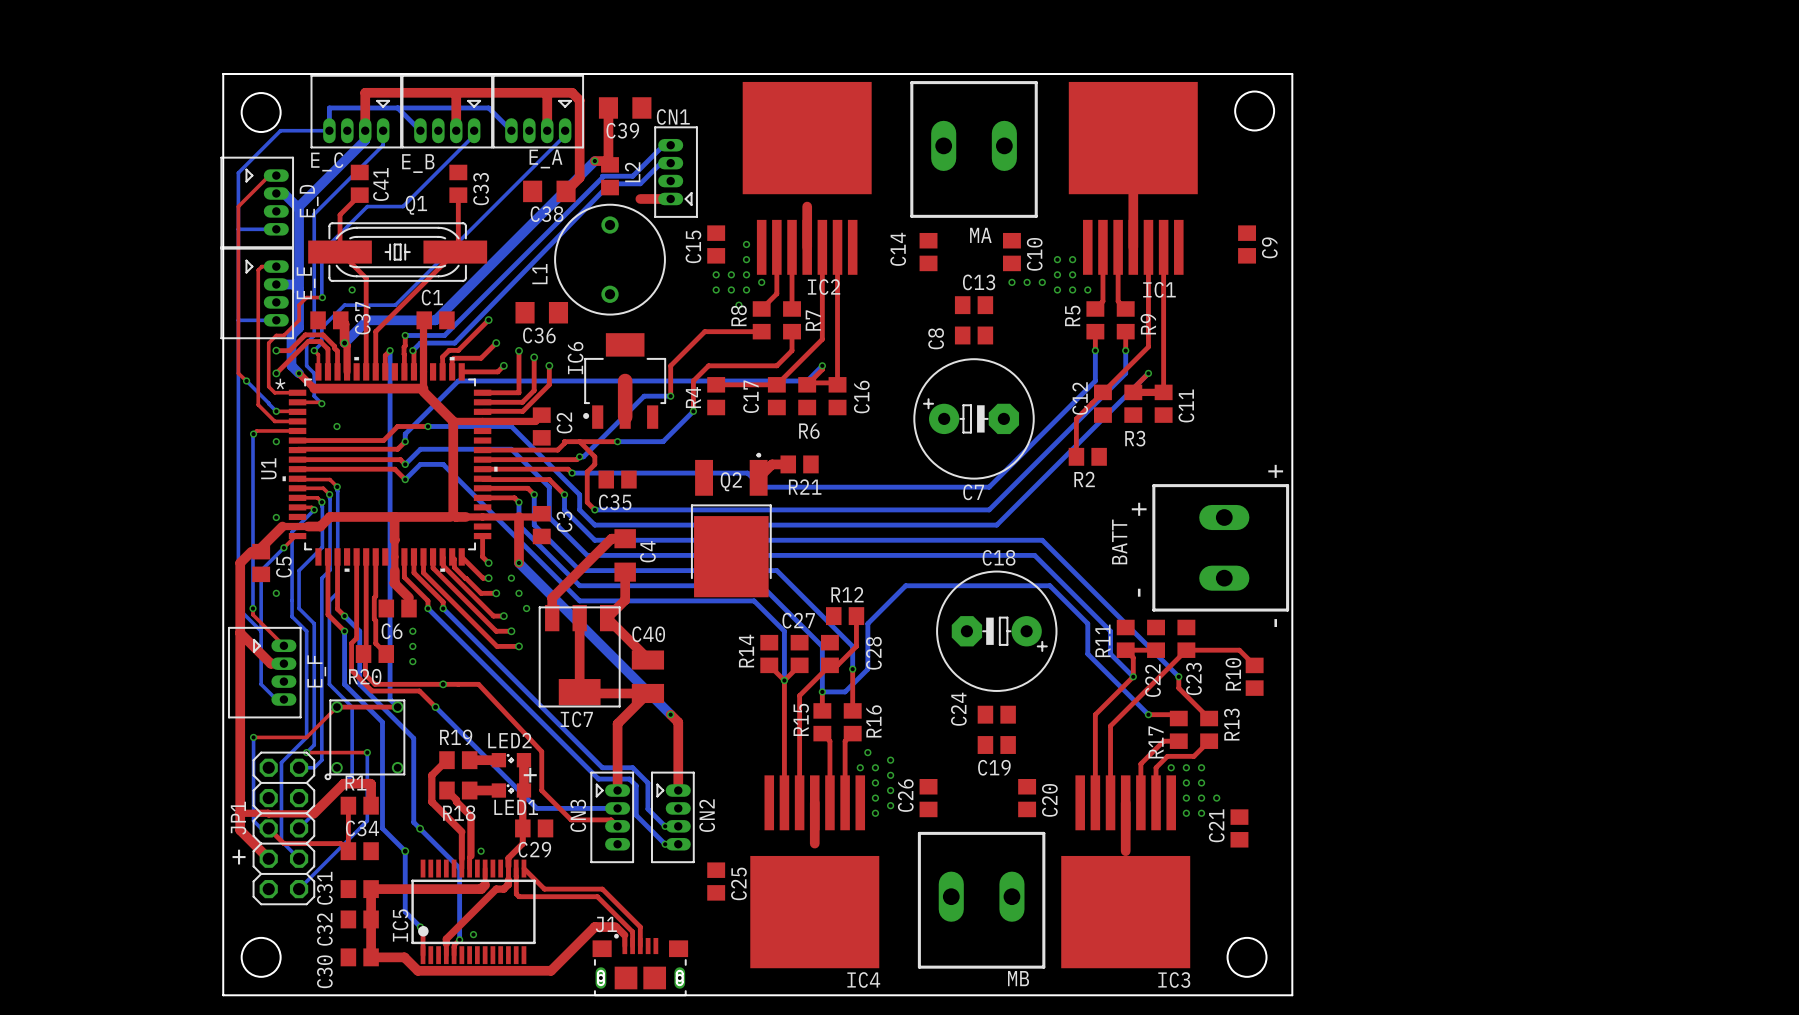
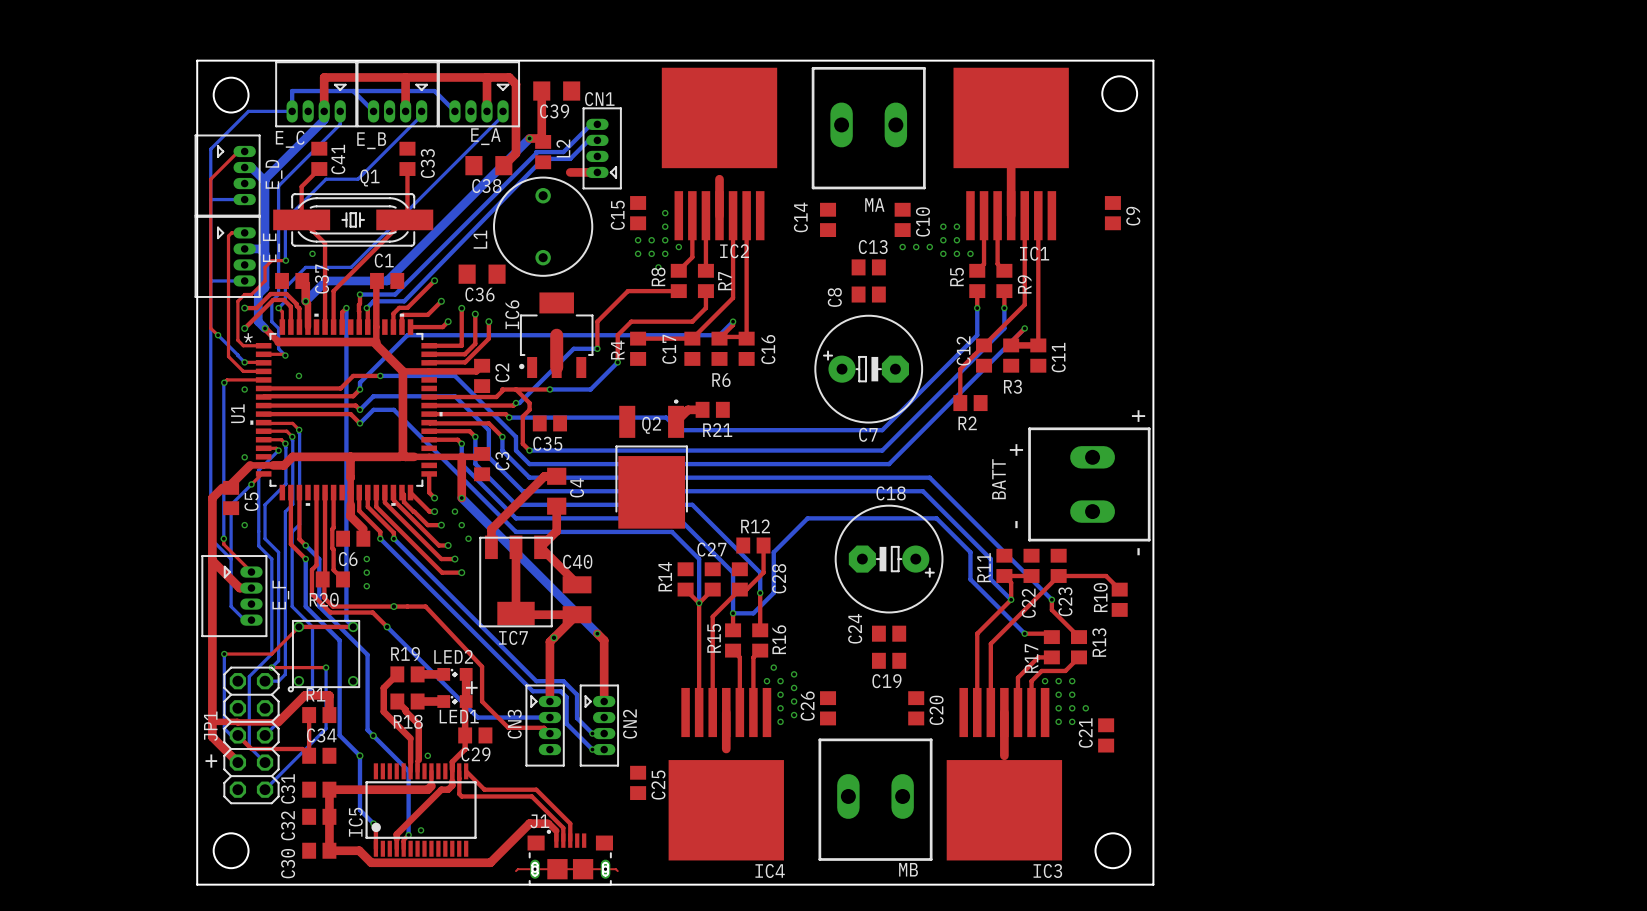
via: none -> (554, 637)
top track: none -> (516, 871) (517, 869) (615, 869) (617, 871)

